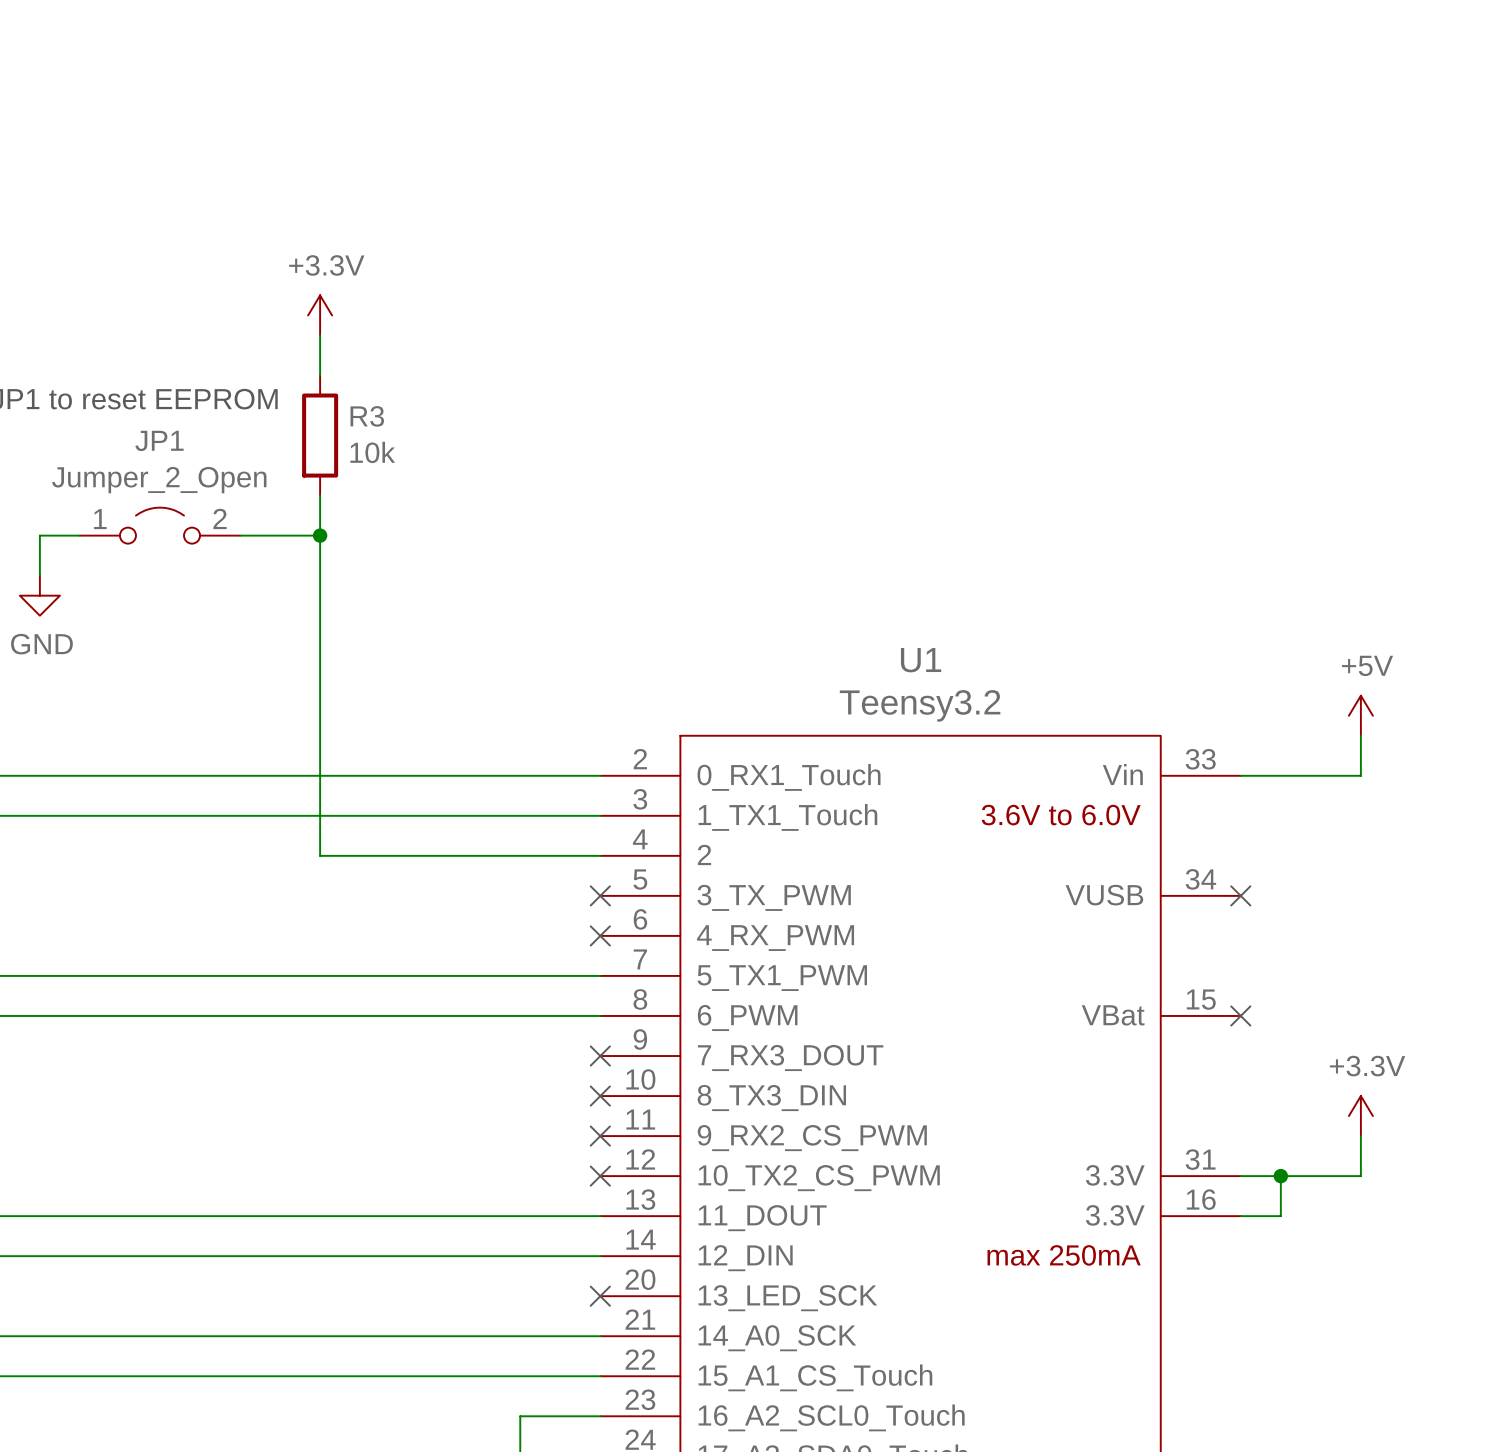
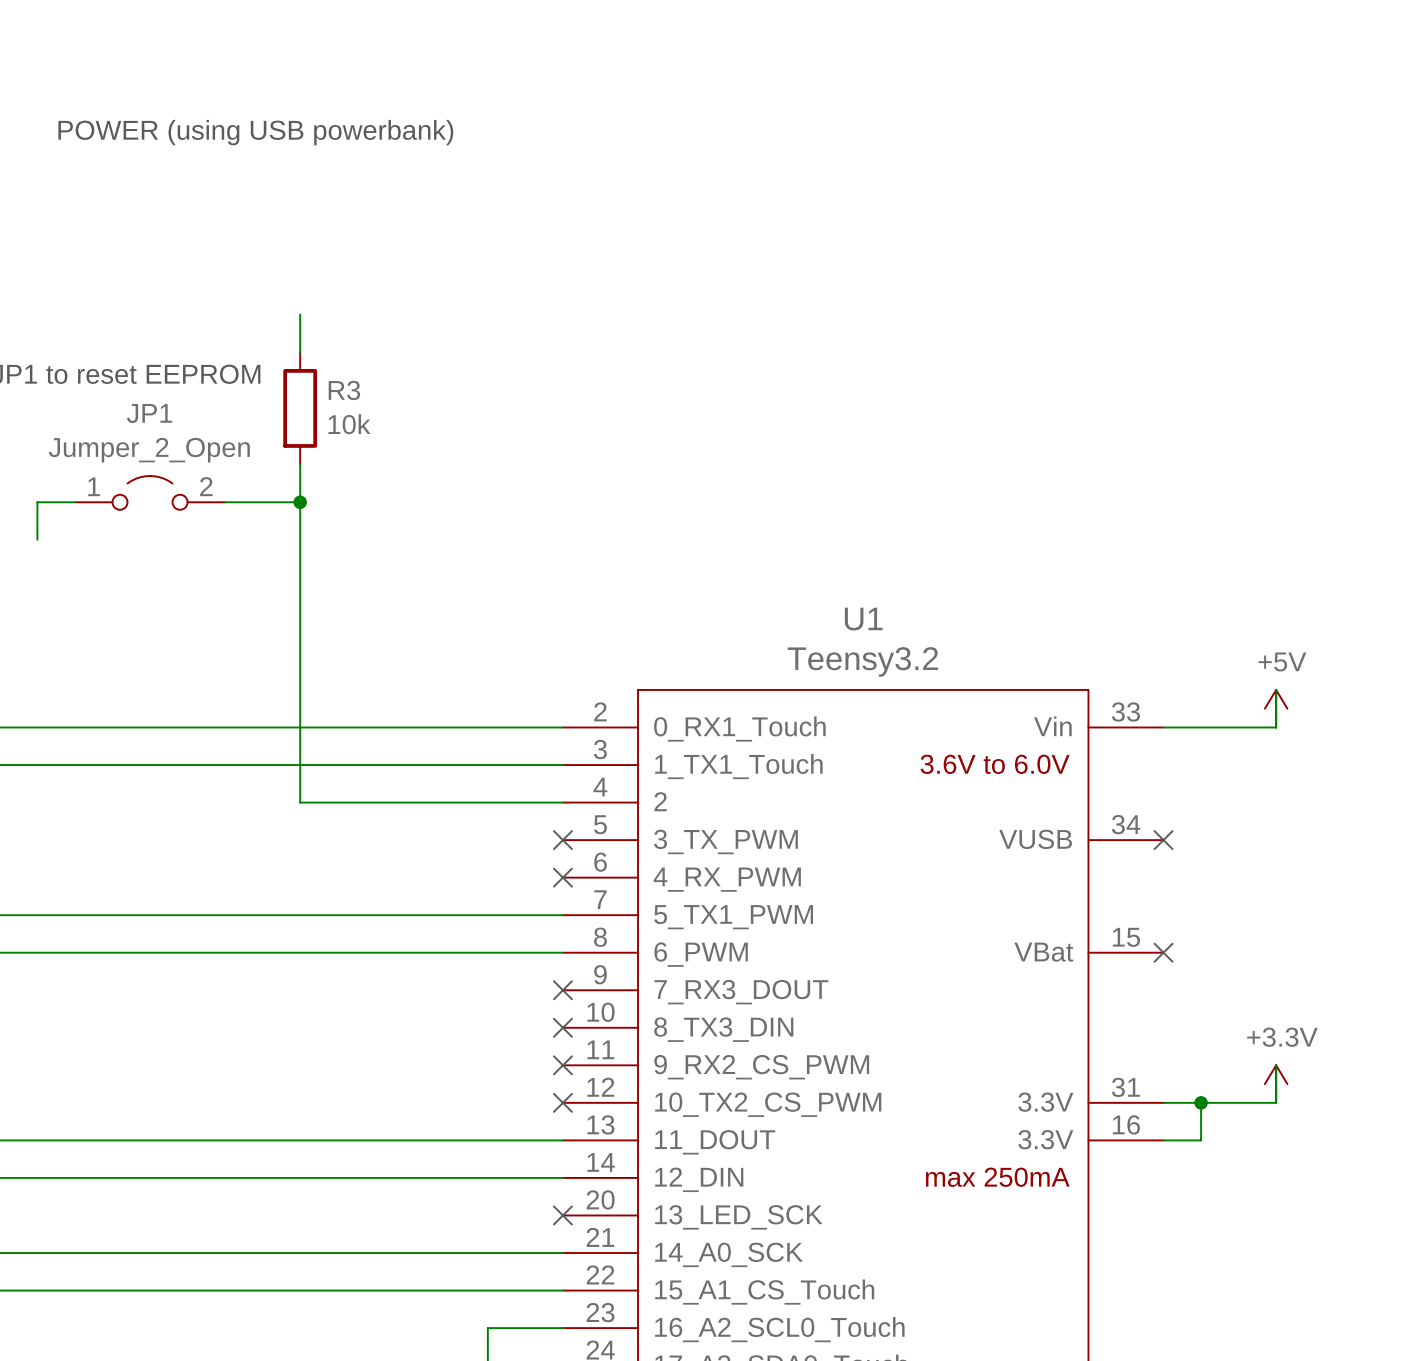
text: none -> POWER (using USB powerbank) (255, 132)
power symbol: +3.3V (320, 315) -> none
power symbol: GND (39, 595) -> none
power symbol position: +5V (1360, 715) -> +5V (1276, 708)
power symbol position: +3.3V (1360, 1116) -> +3.3V (1276, 1084)

